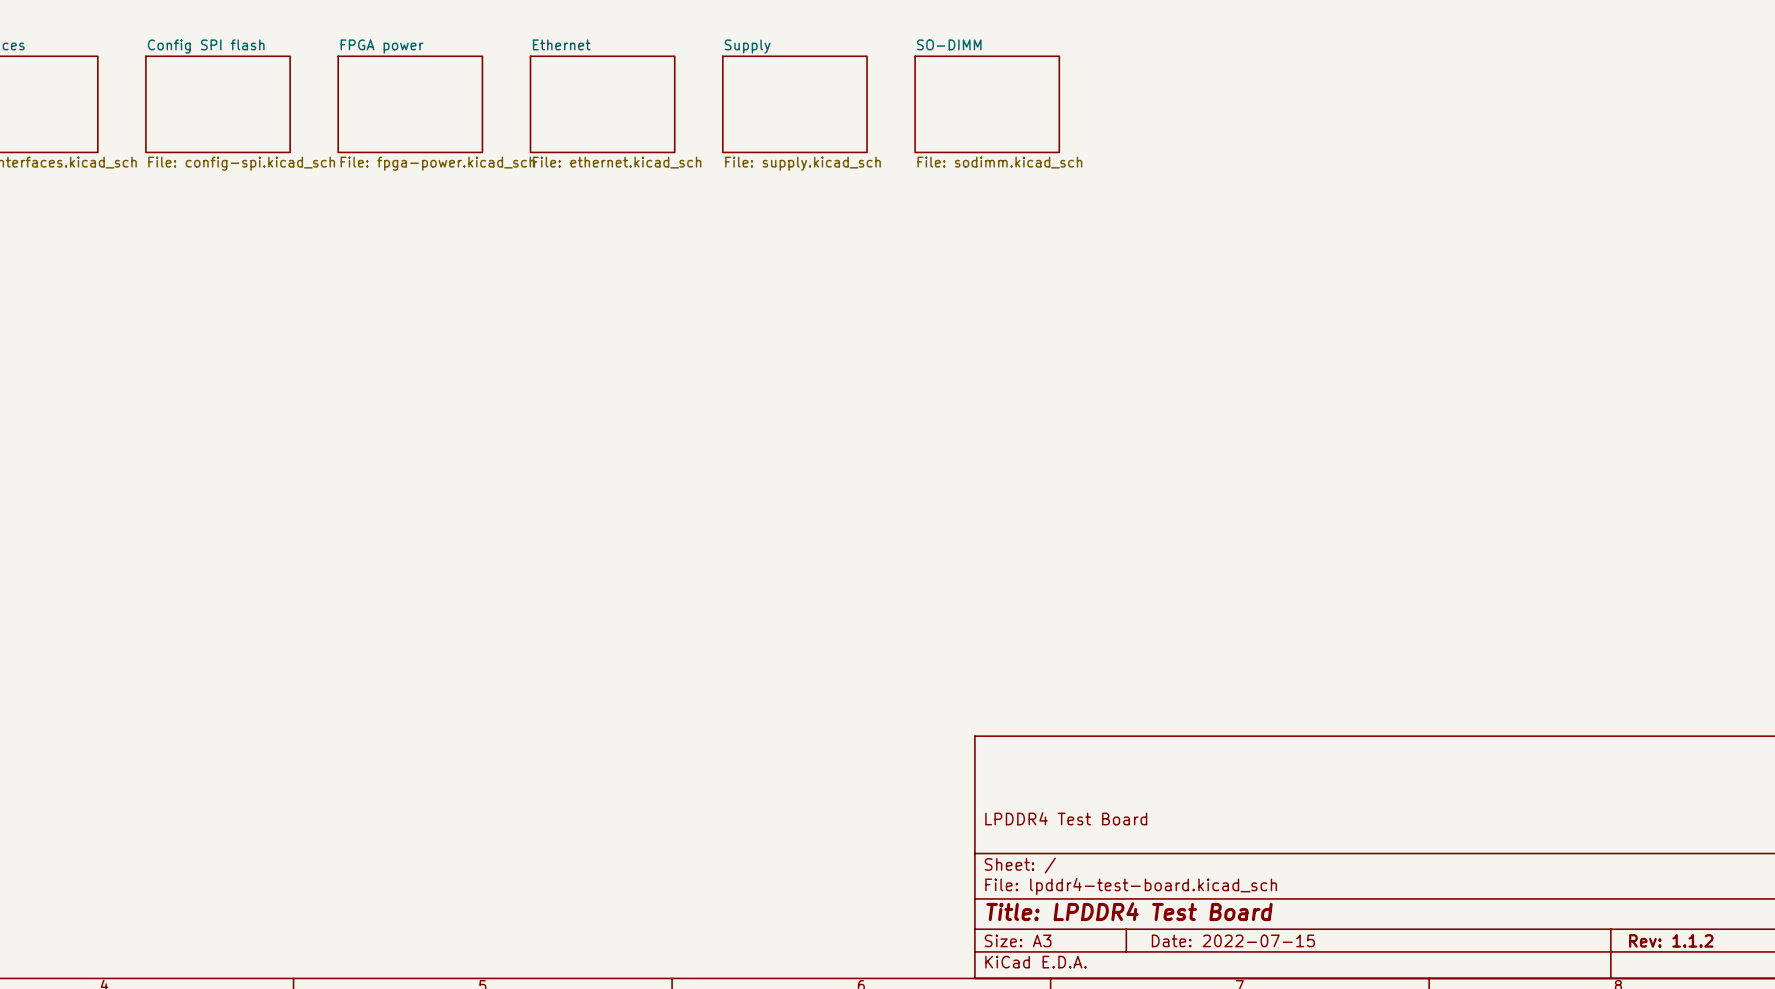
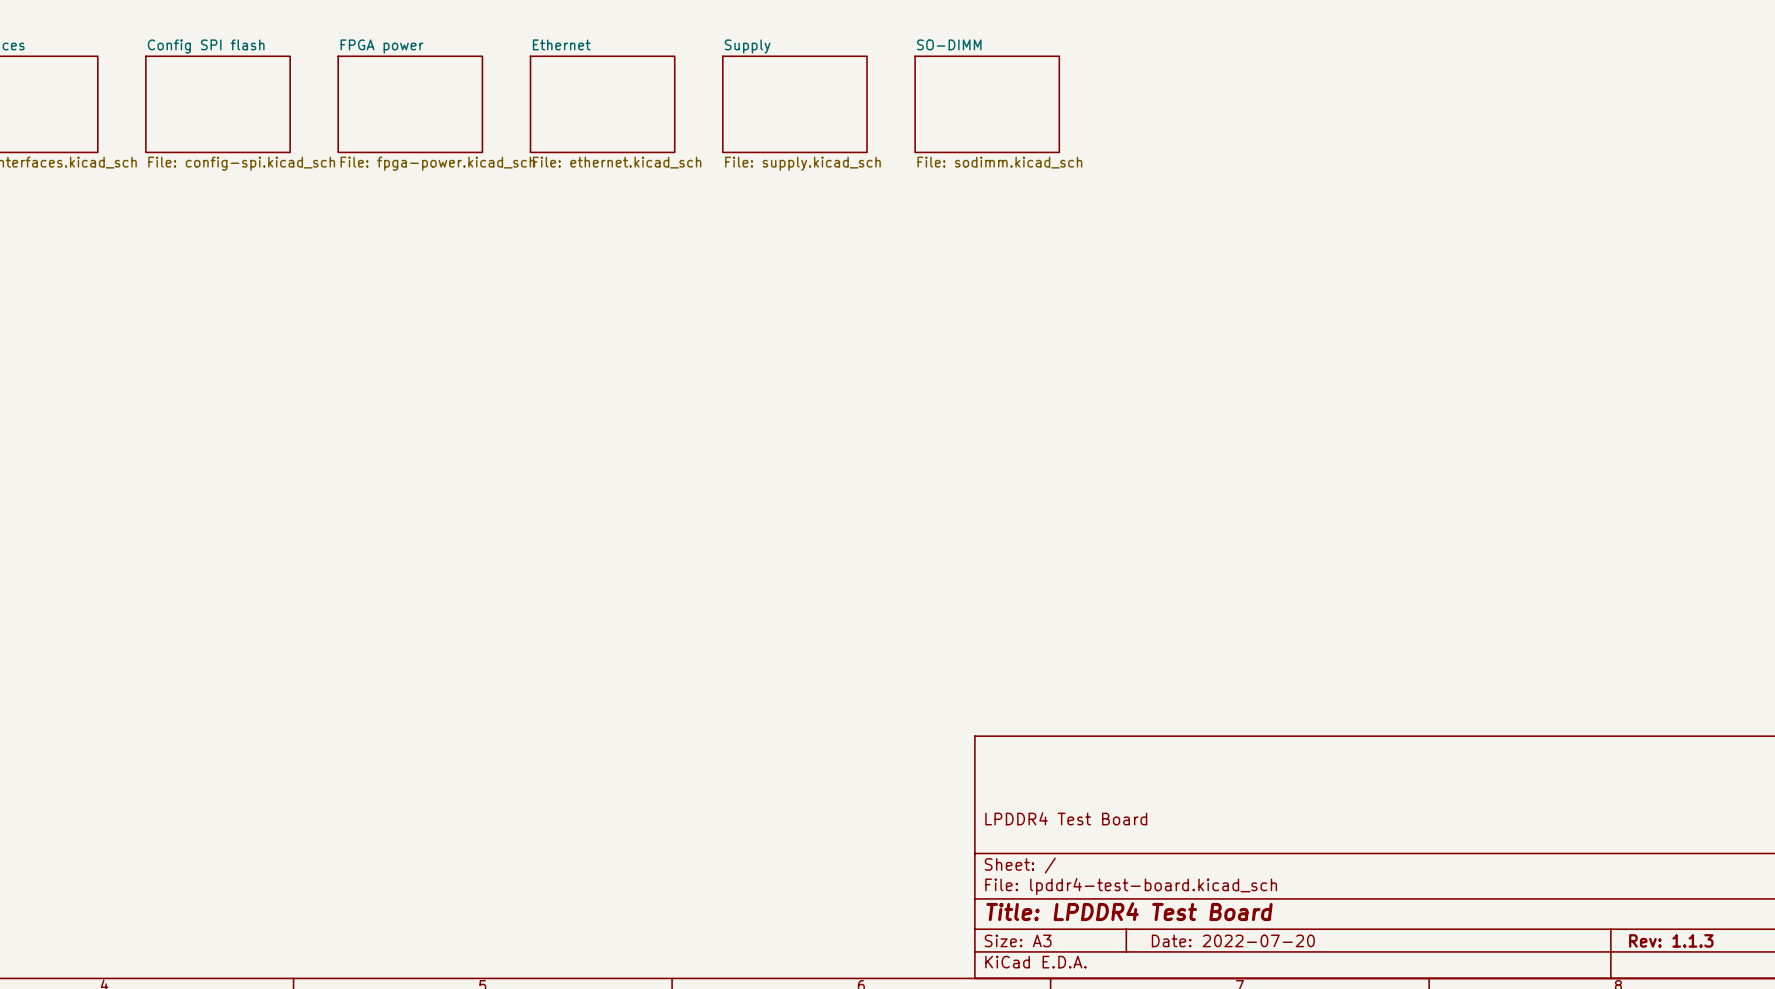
title block: Date: 2022-07-15 (1233, 940) -> Date: 2022-07-20 (1233, 940)
title block: Rev: 1.1.2 (1671, 940) -> Rev: 1.1.3 (1671, 940)

